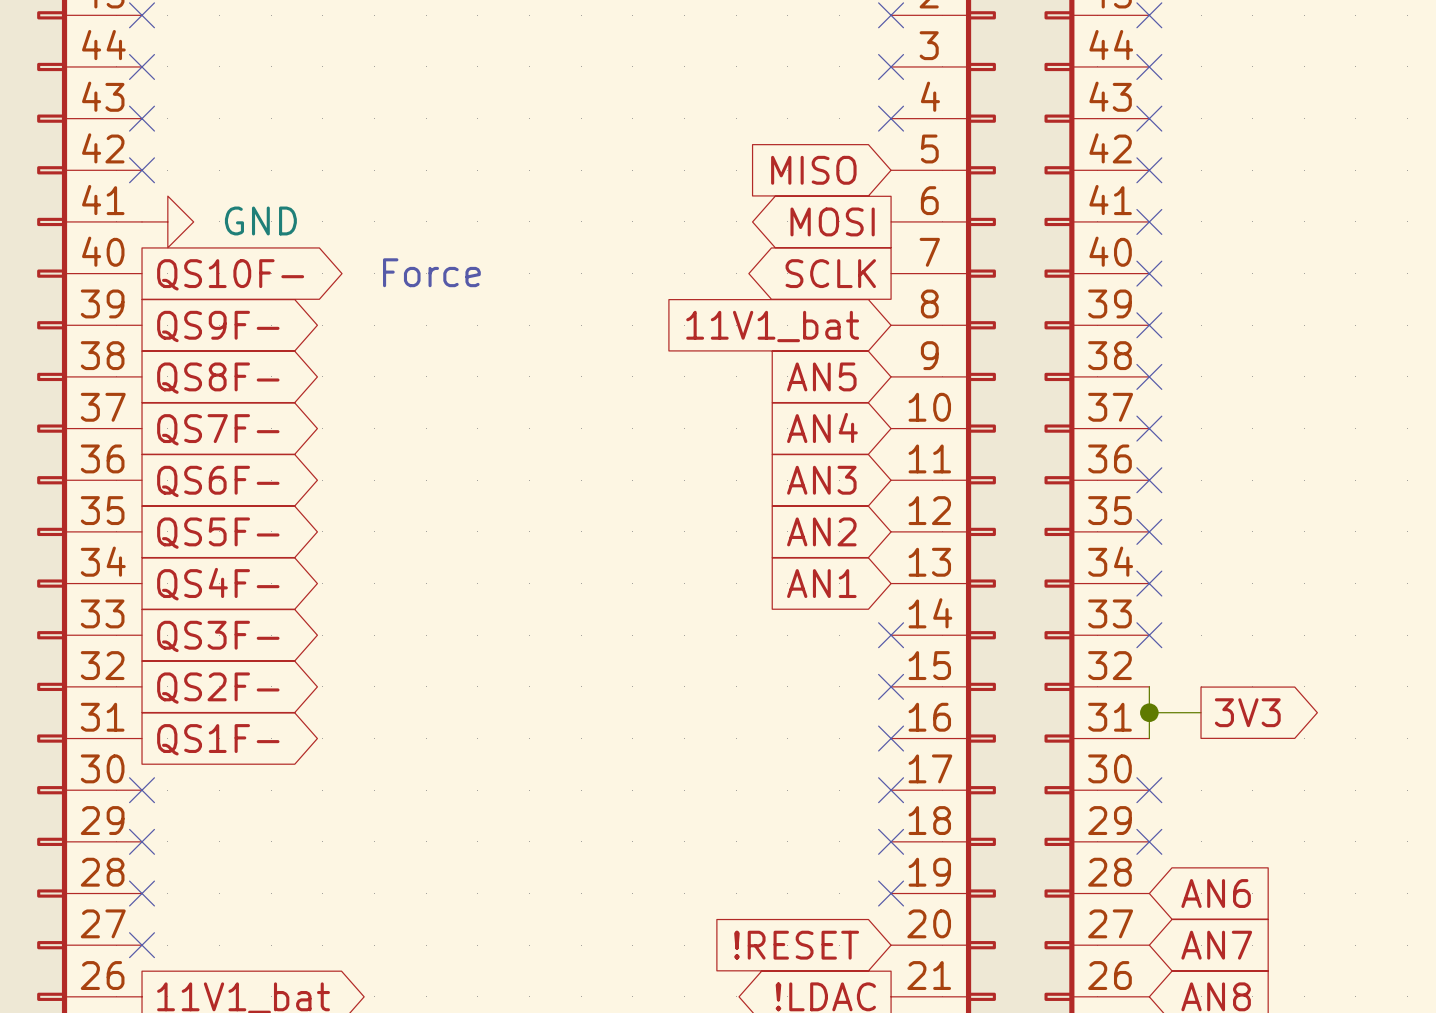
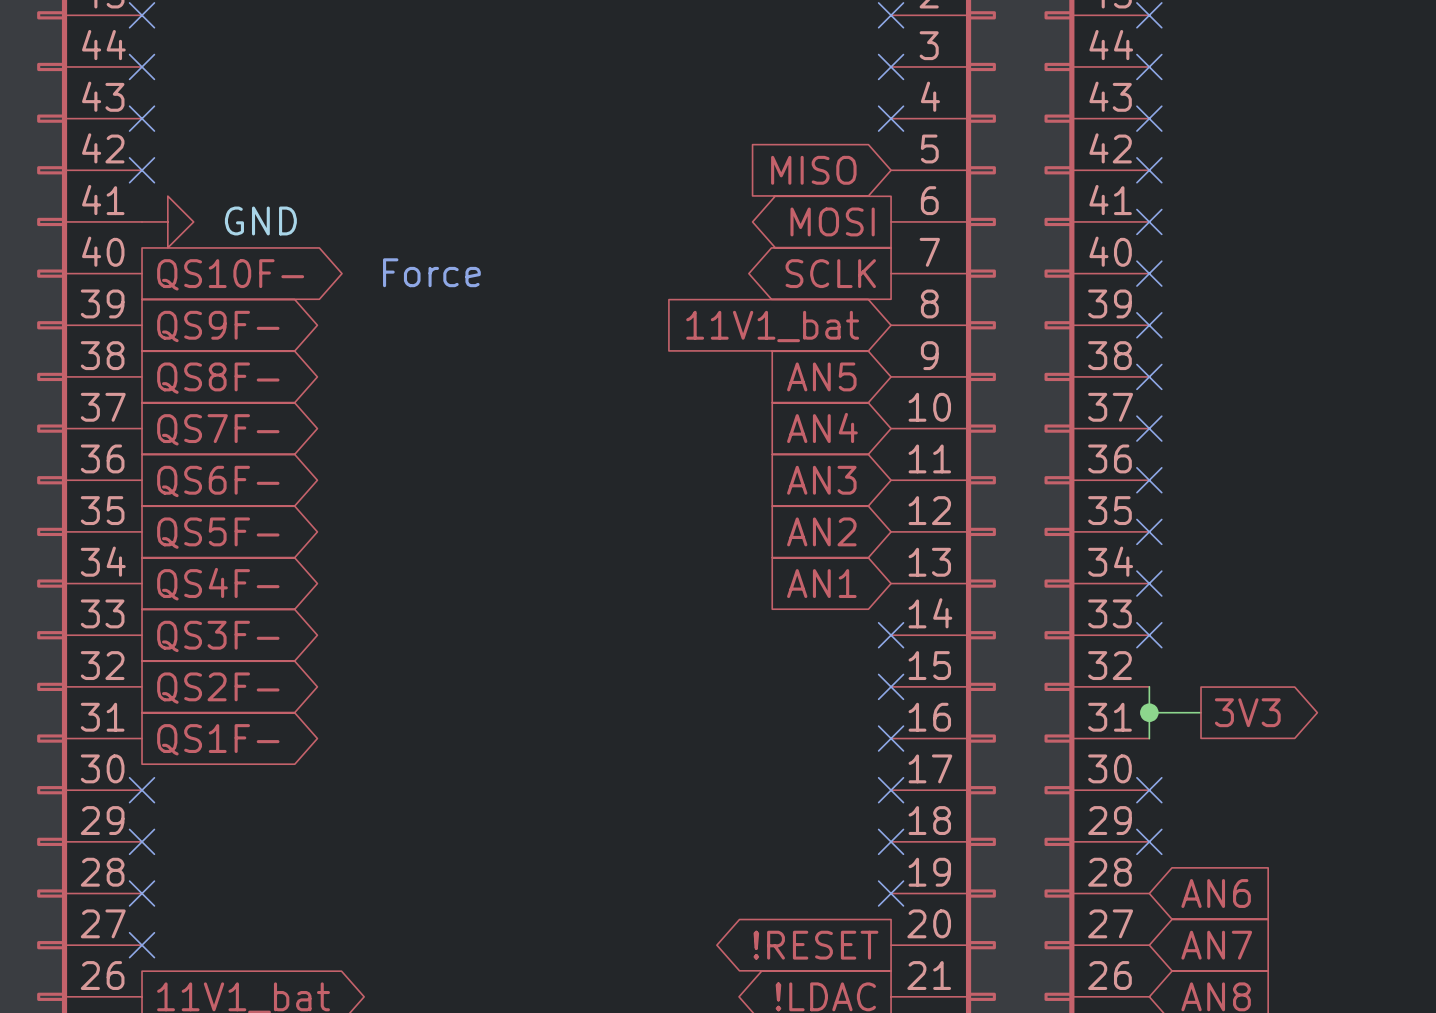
global label shape: input (796, 945) -> output (815, 945)

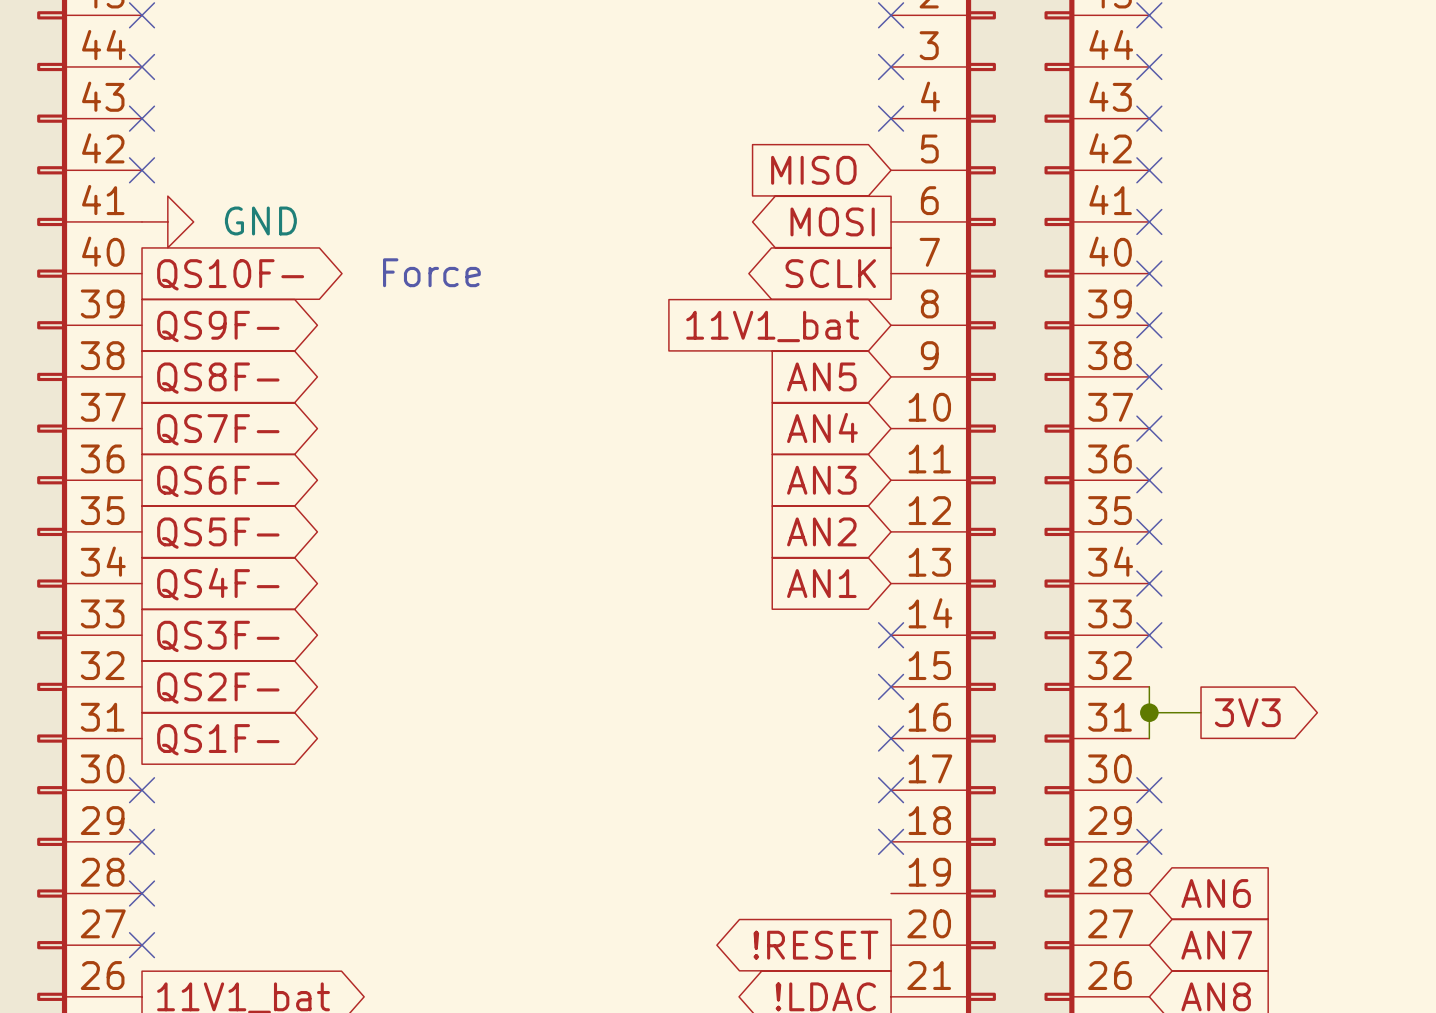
no-connect mark: (891, 893) -> none

